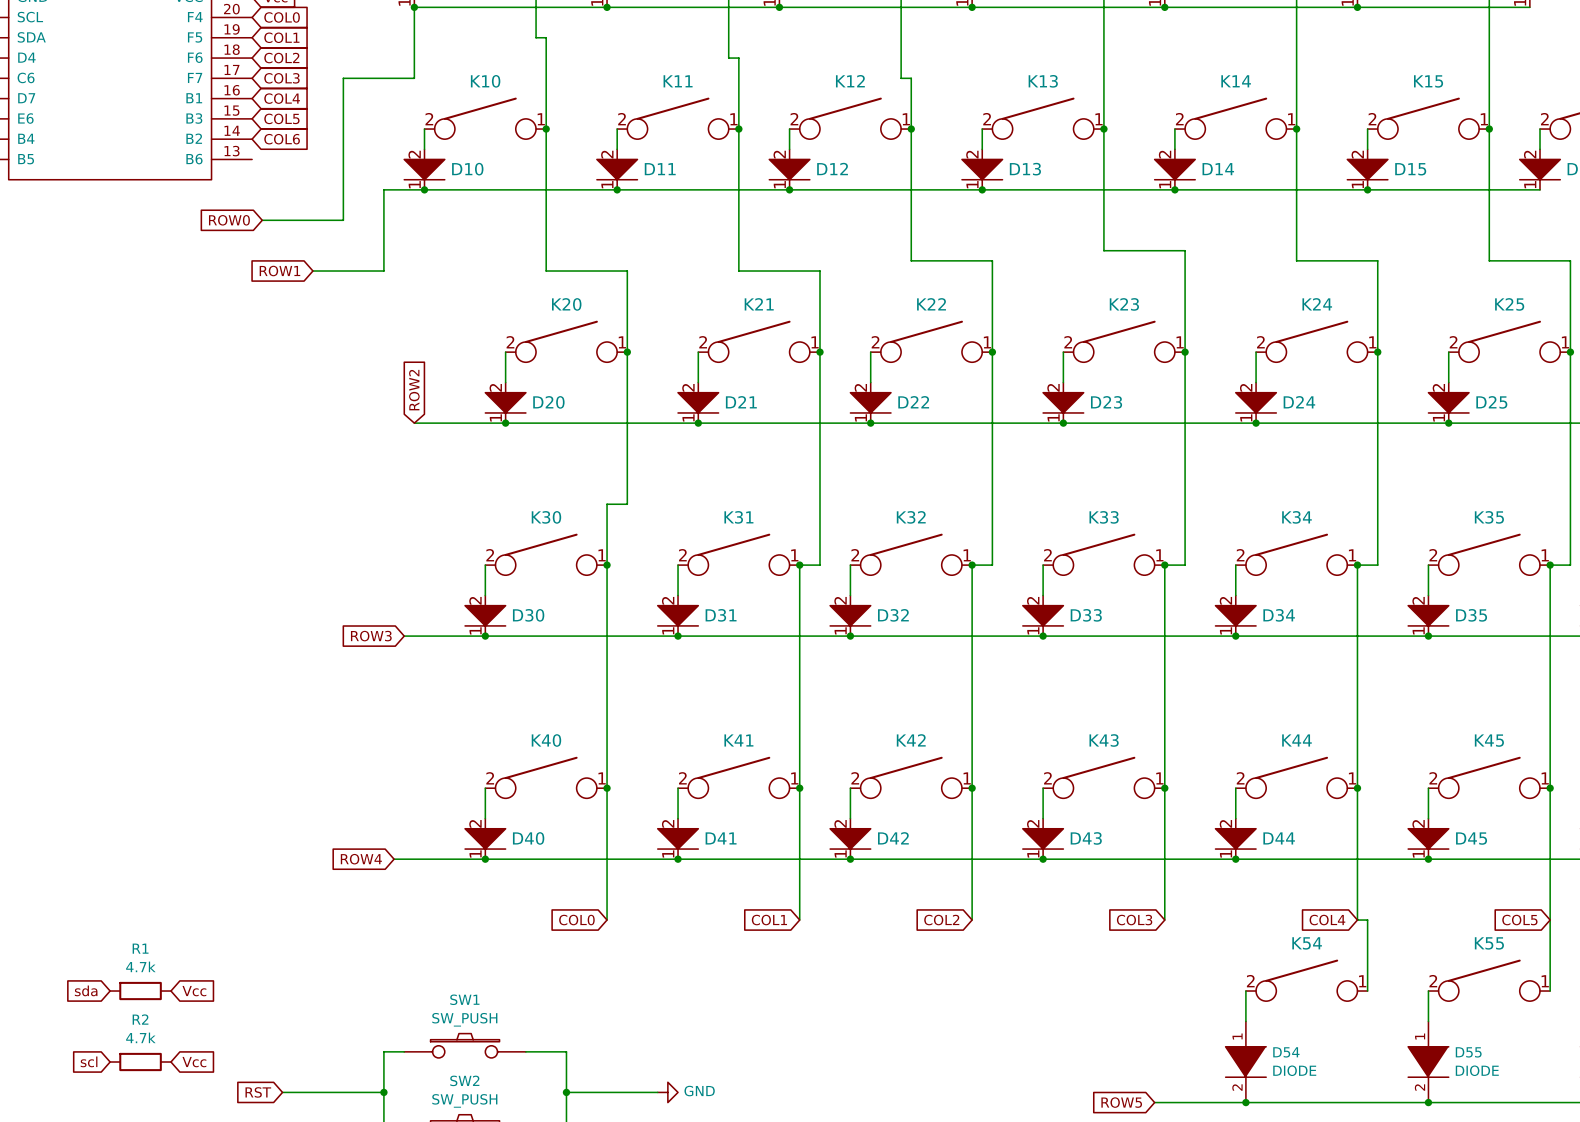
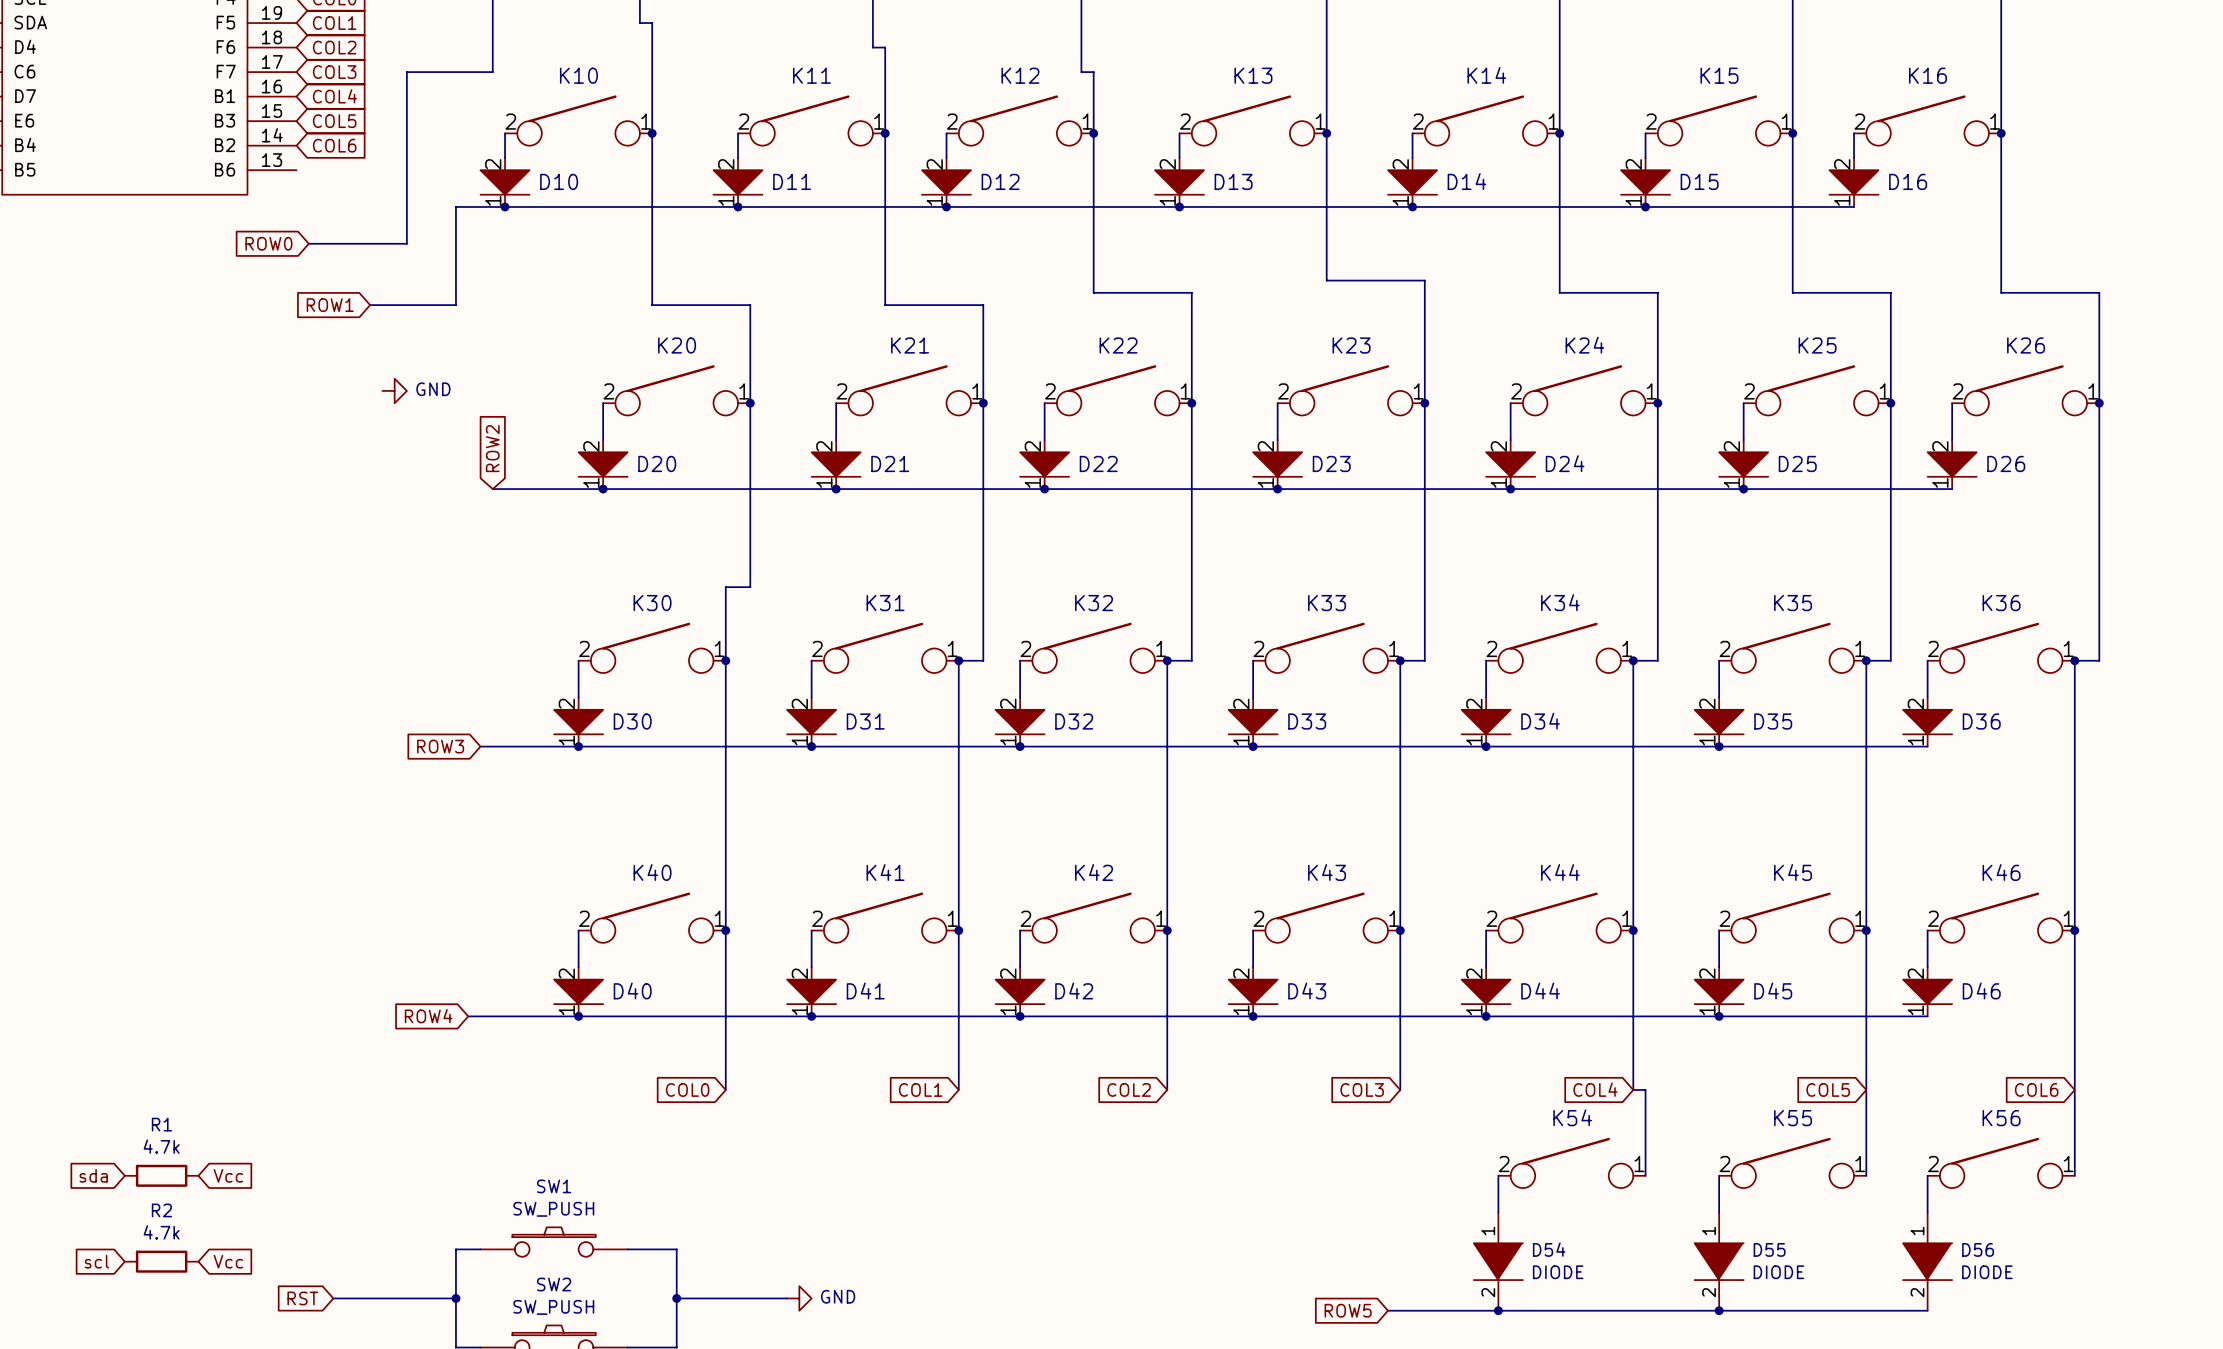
power symbol: none -> GND (394, 390)

